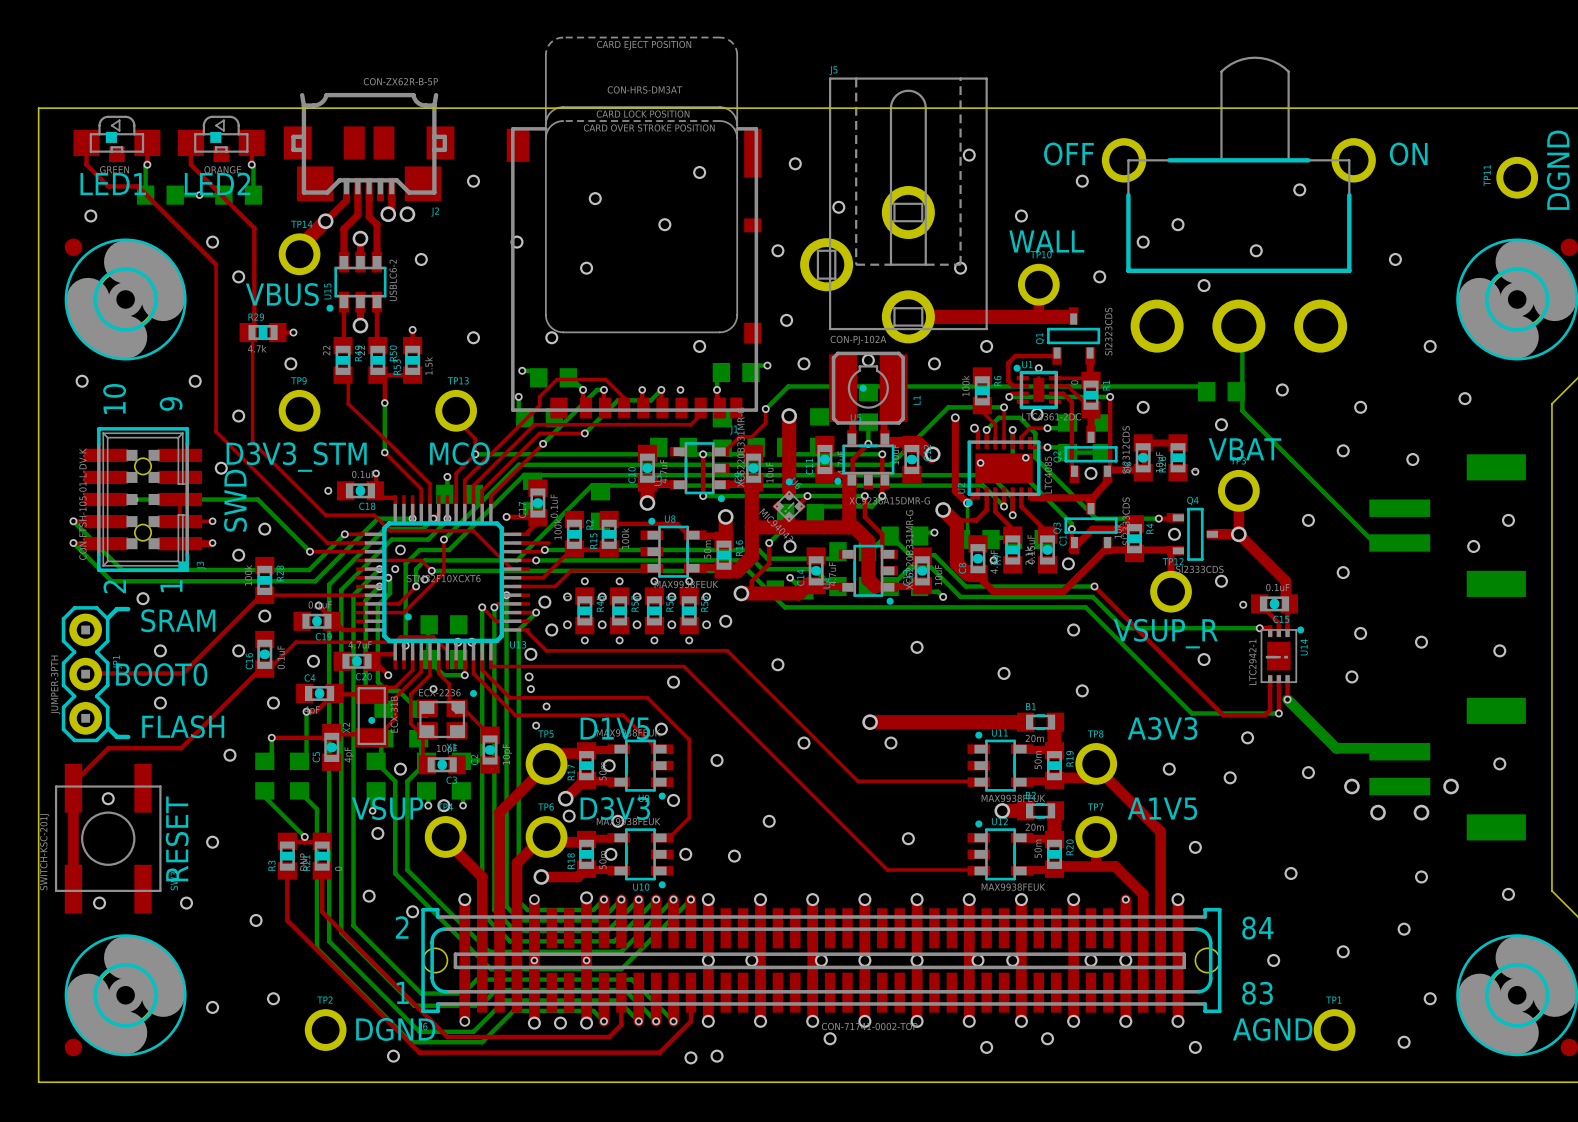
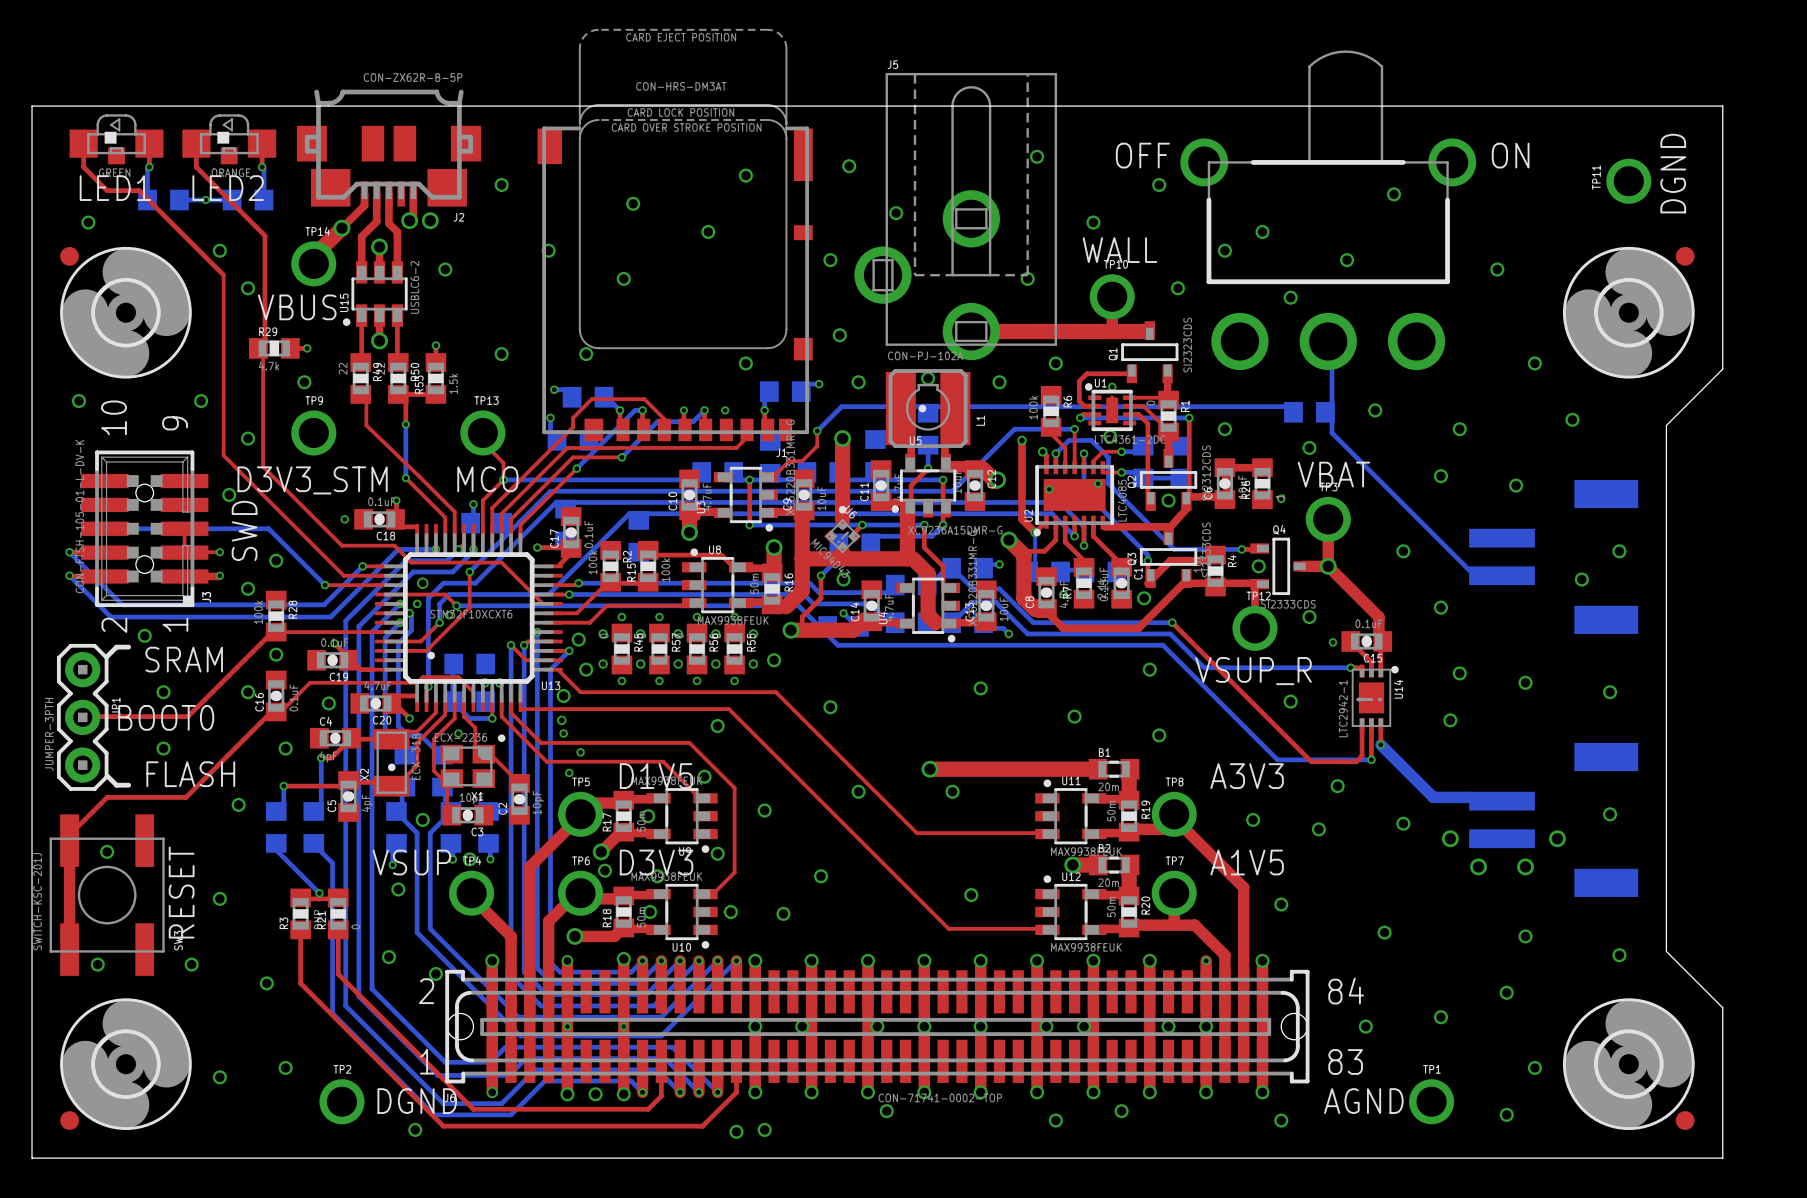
top track: (521, 543) (549, 543) -> none

